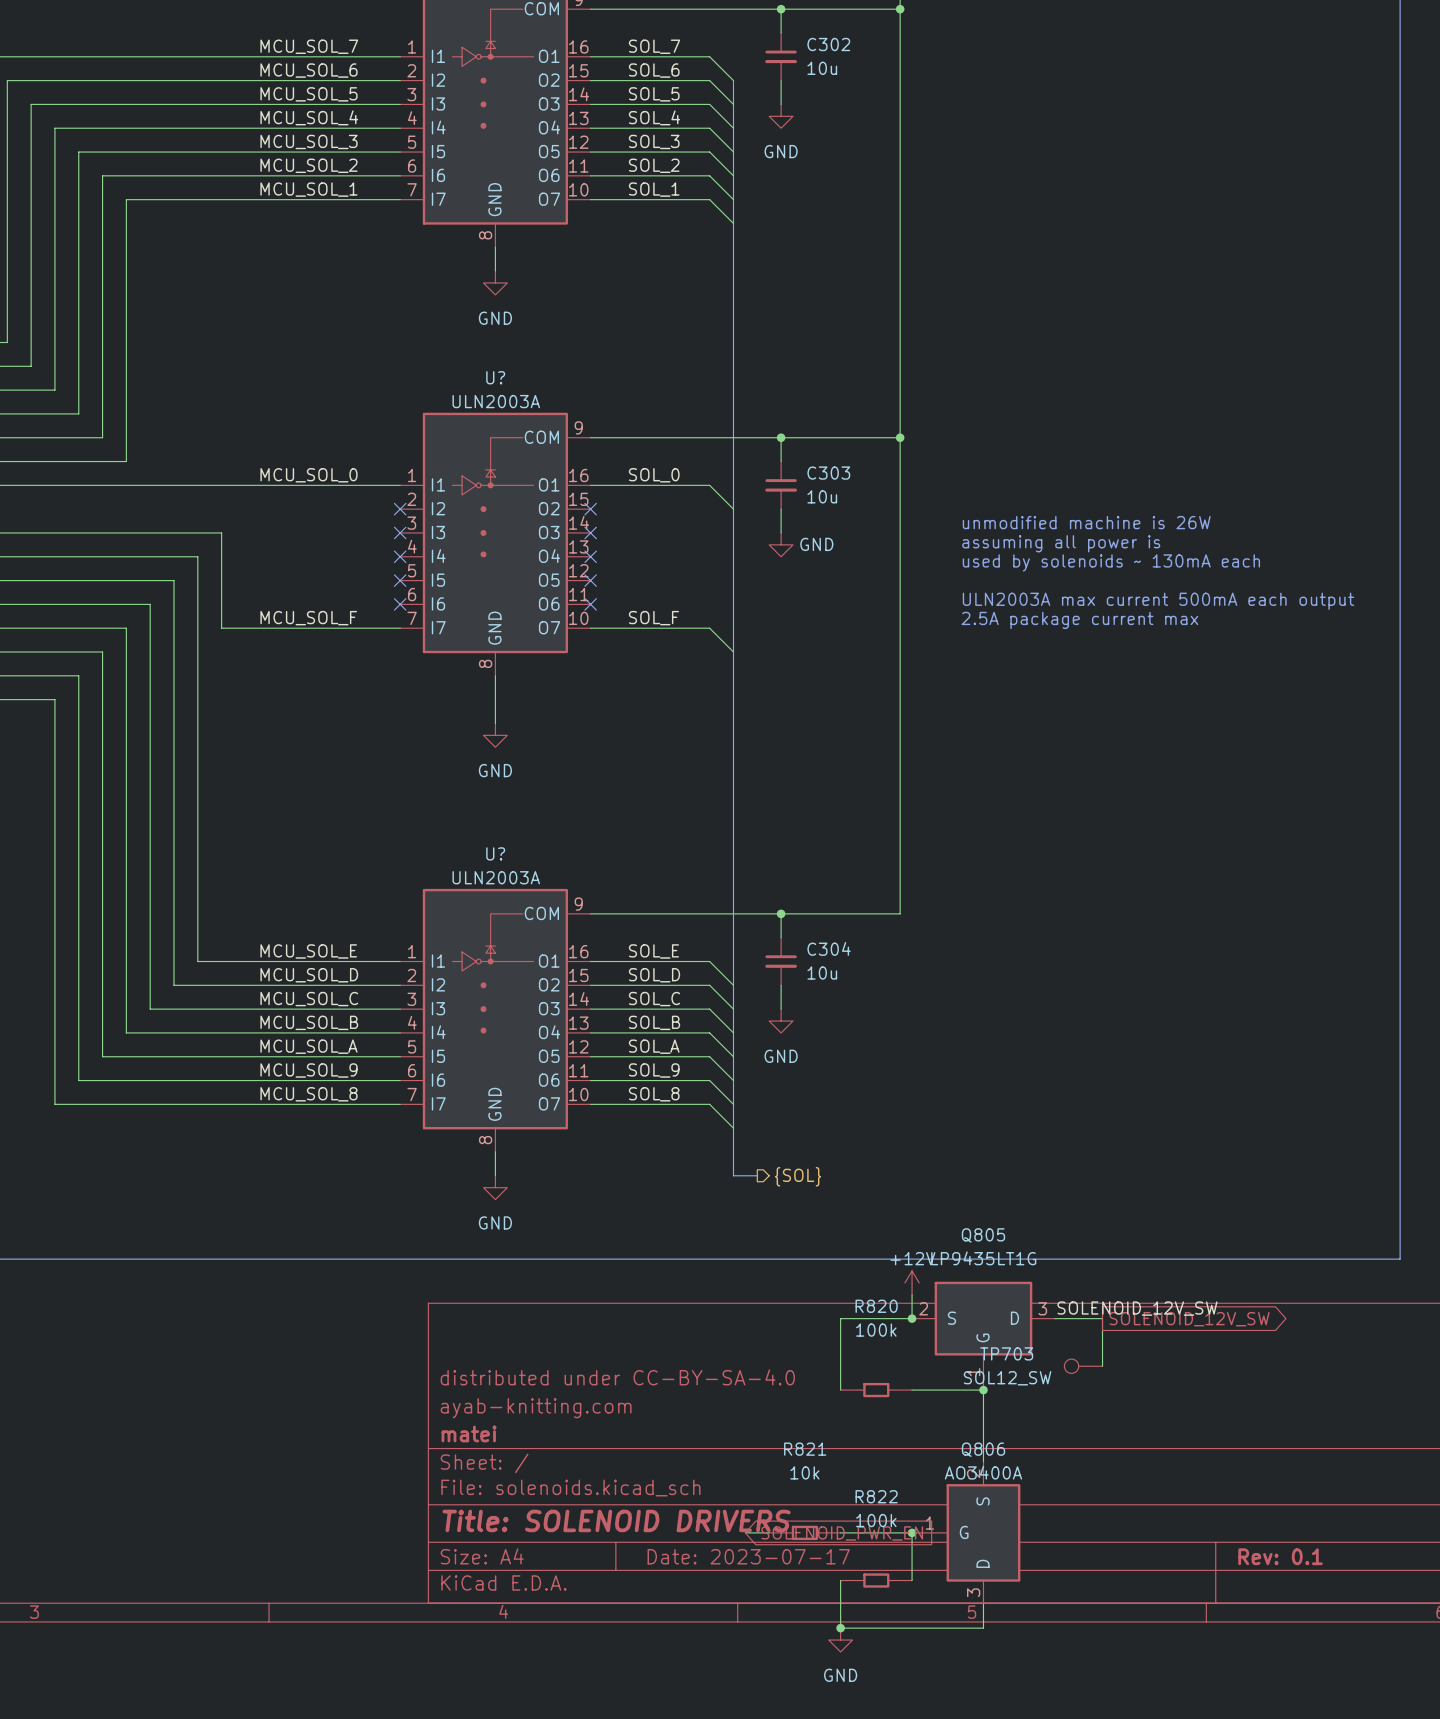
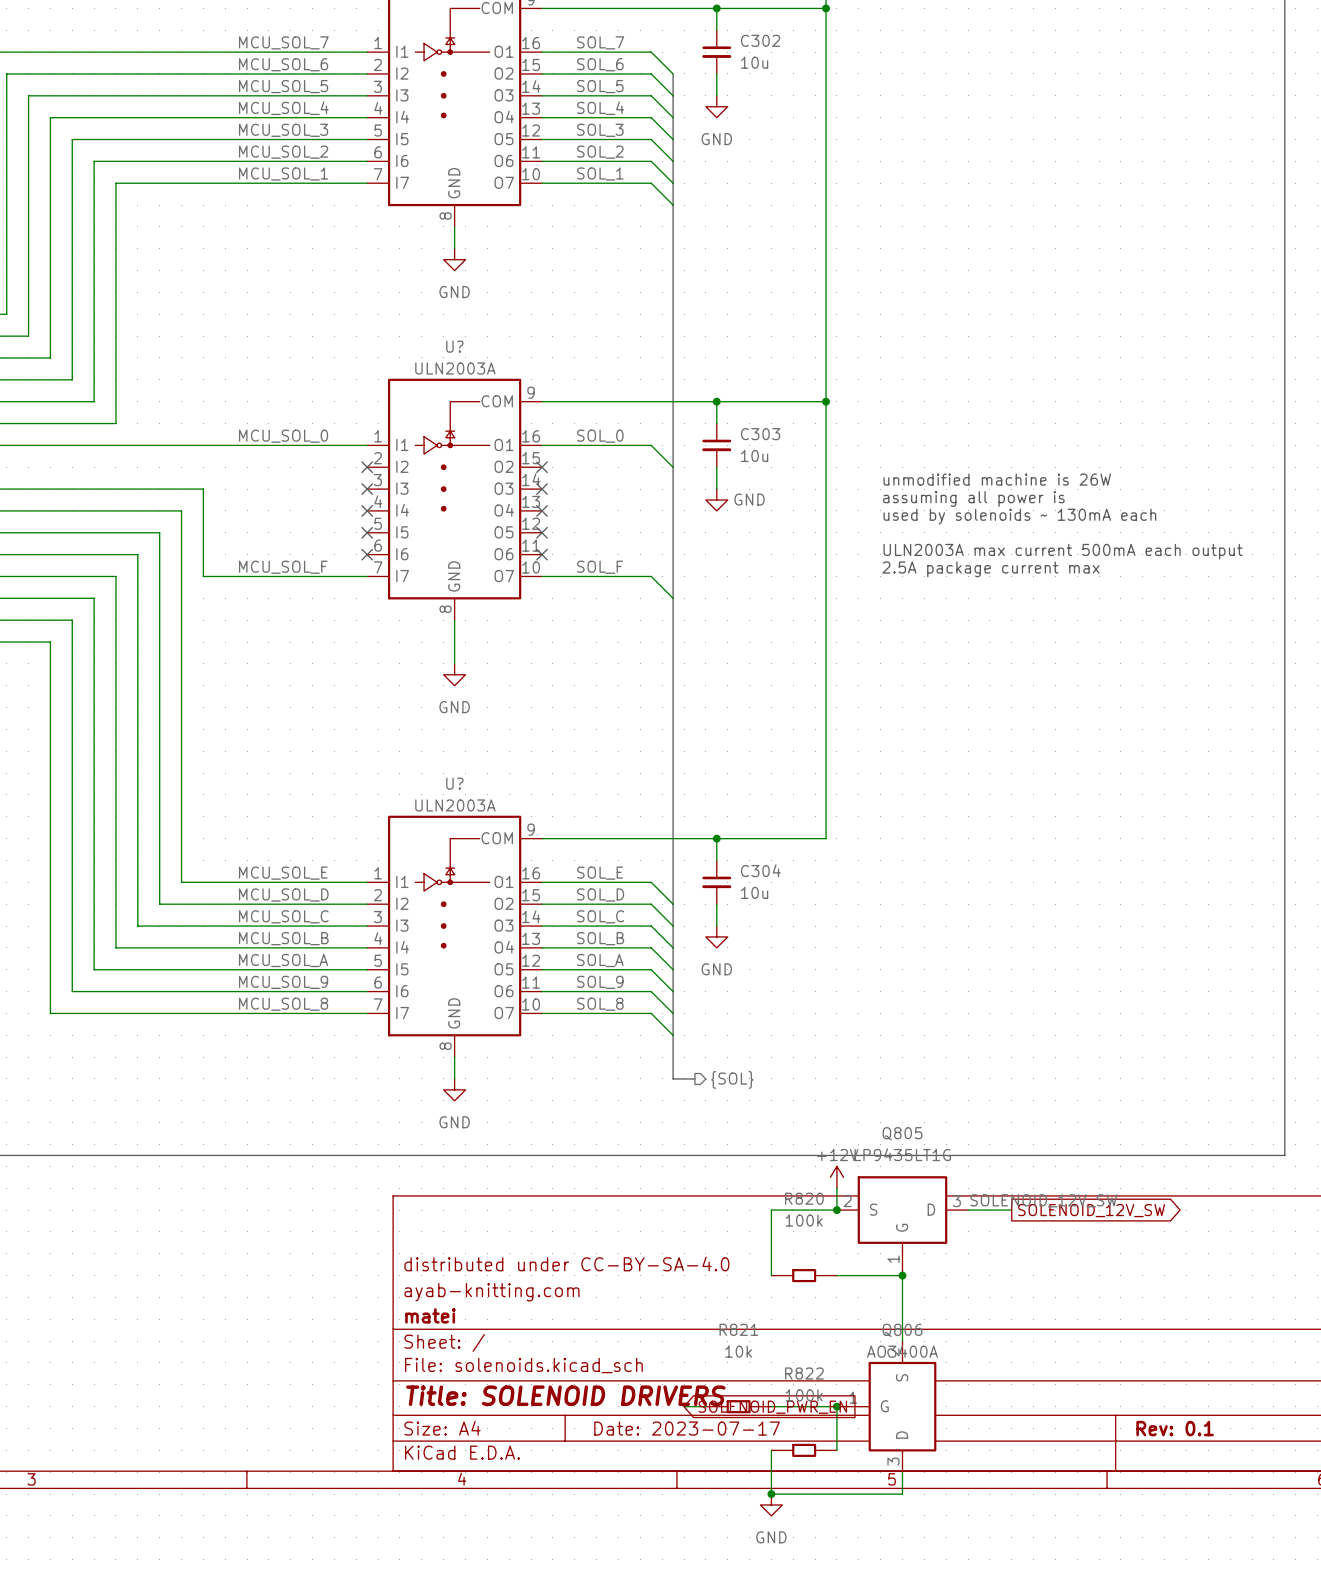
wire: (1102, 1318) (1102, 1366) -> none
TP703: SOL12_SW (1083, 1366) -> none

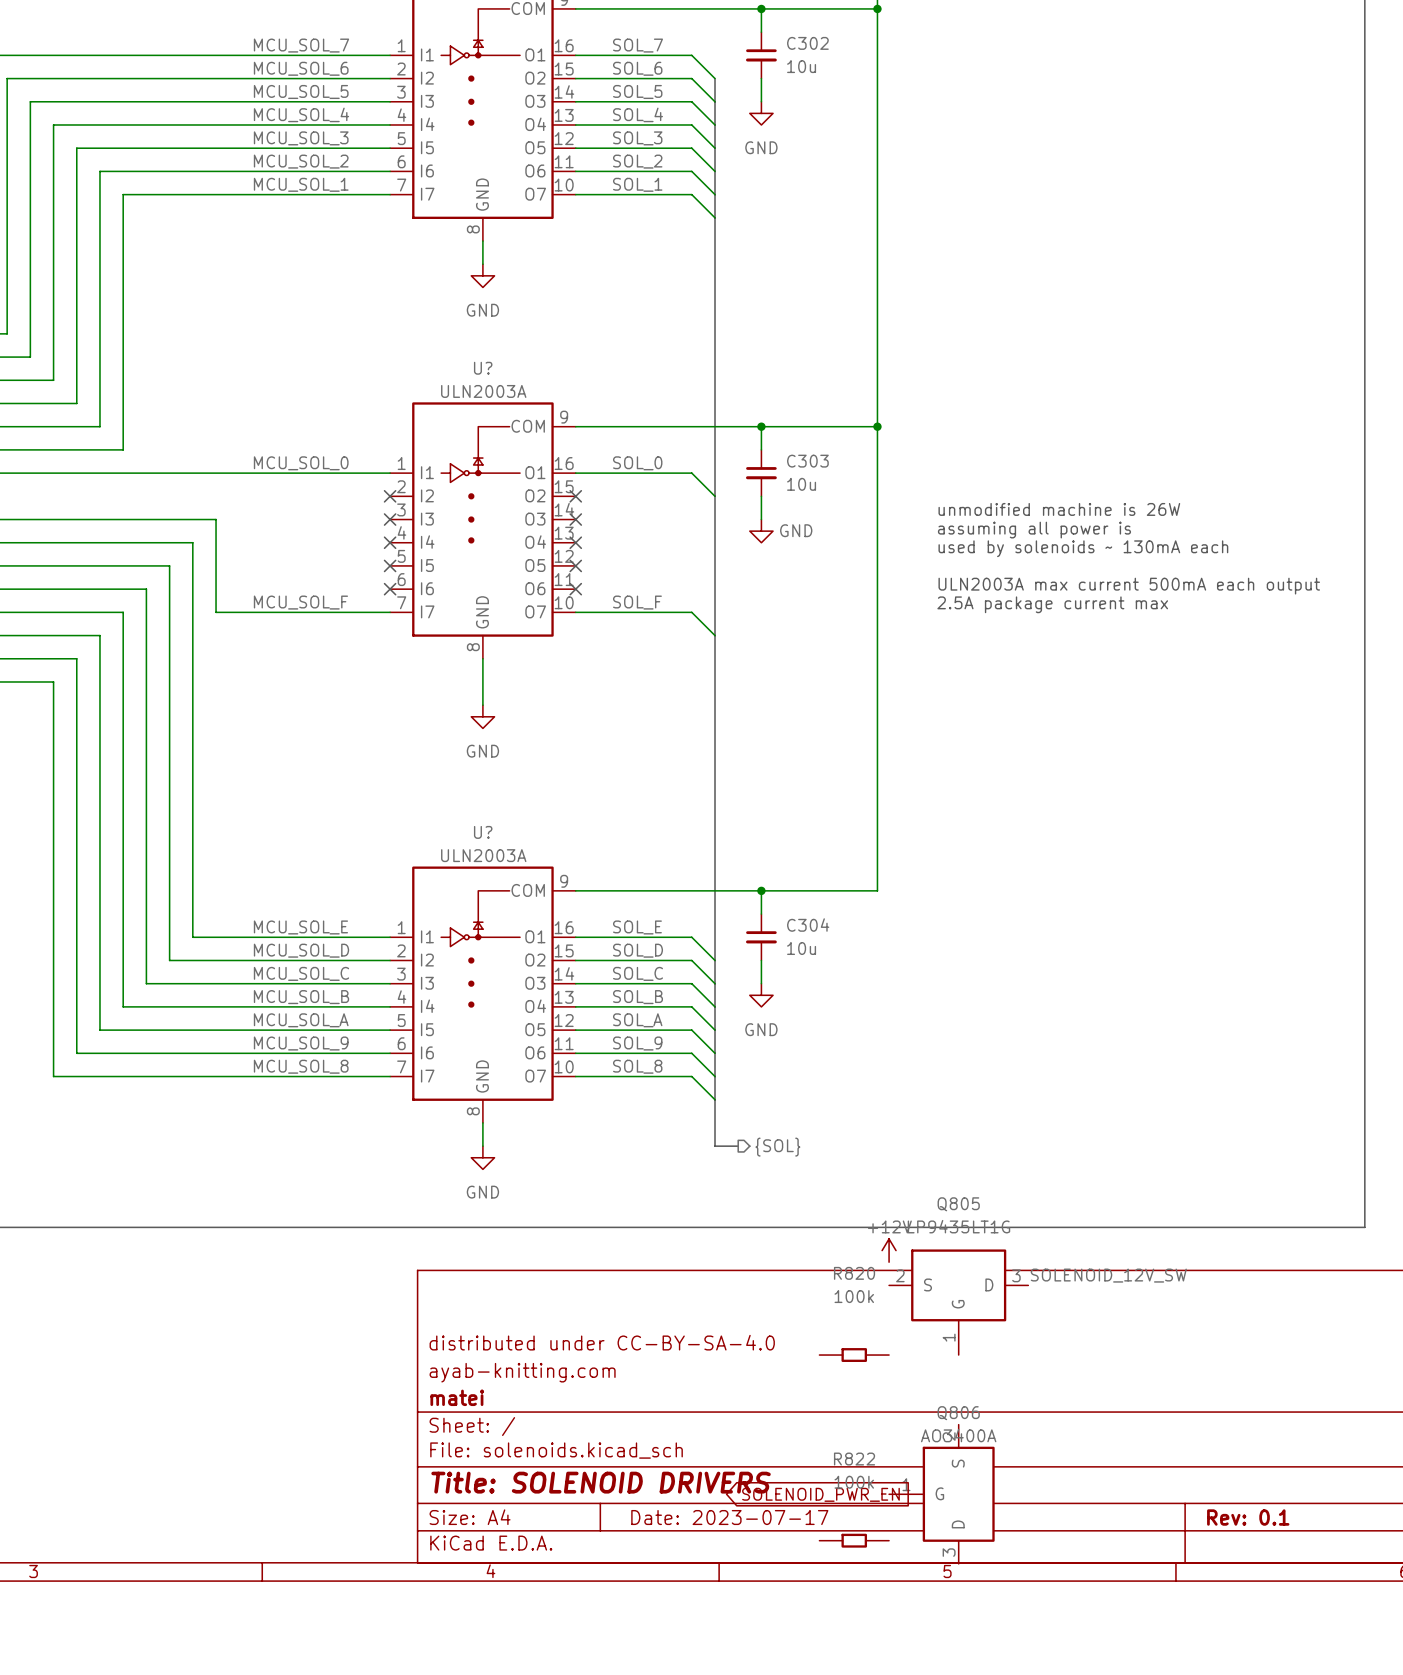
wire: (836, 1188) (836, 1210) (771, 1210) (771, 1275) -> none
junction: (836, 1210) -> none
wire: (968, 1210) (1011, 1210) -> none
global label: SOLENOID_12V_SW (1091, 1210) -> none
wire: (836, 1275) (902, 1275) (902, 1341) -> none
junction: (902, 1275) -> none
wire: (684, 1406) (705, 1406) -> none
R821: 10k (738, 1406) -> none
wire: (771, 1406) (836, 1406) (836, 1450) -> none
junction: (836, 1406) -> none
wire: (771, 1450) (771, 1494) (902, 1494) (902, 1472) -> none
junction: (771, 1494) -> none
power symbol: GND (771, 1505) -> none

